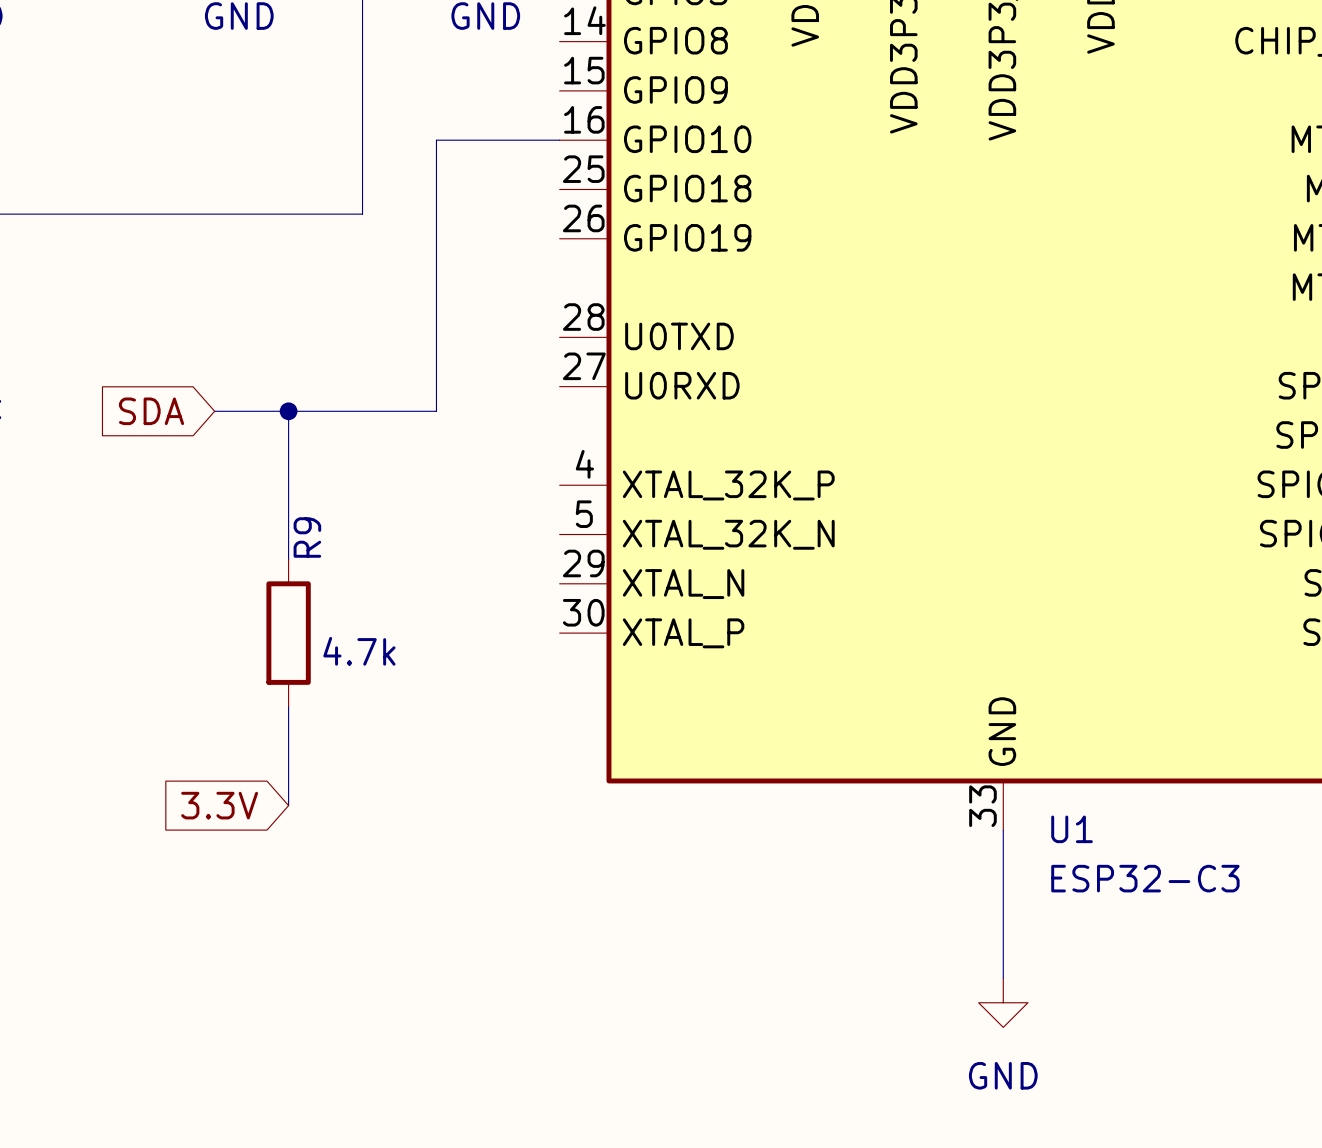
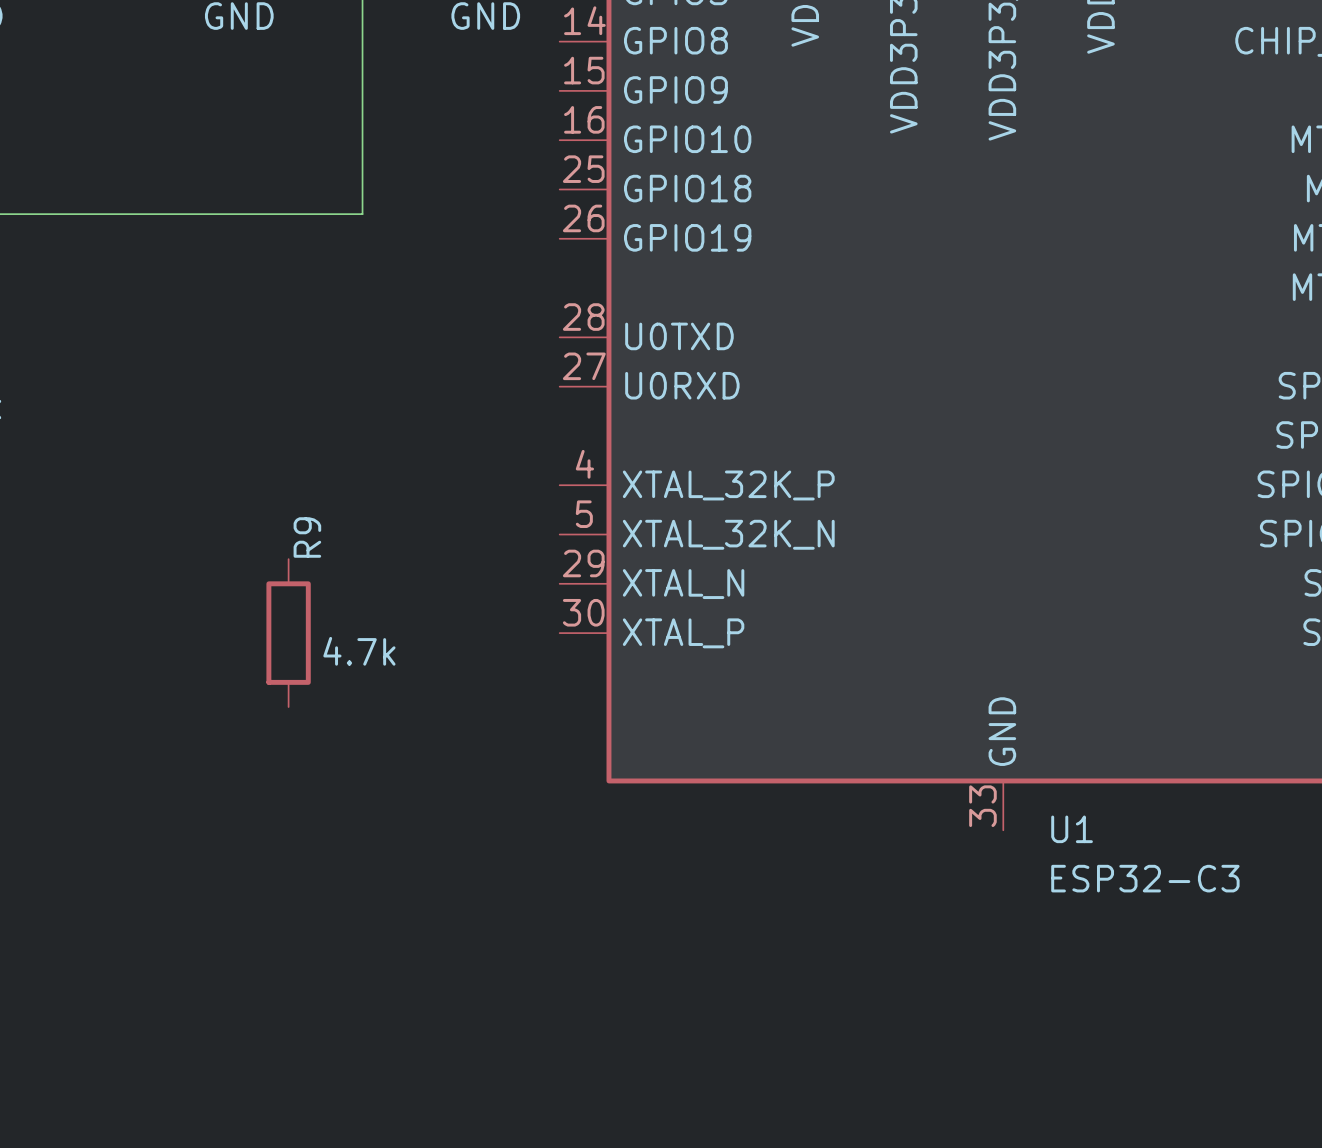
wire: (559, 140) (436, 140) (436, 411) (214, 411) -> none
global label: SDA (151, 411) -> none
wire: (288, 411) (288, 559) -> none
junction: (288, 411) -> none
wire: (288, 707) (288, 805) -> none
global label: 3.3V (219, 805) -> none
wire: (1003, 830) (1003, 978) -> none
power symbol: GND (1003, 1002) -> none

